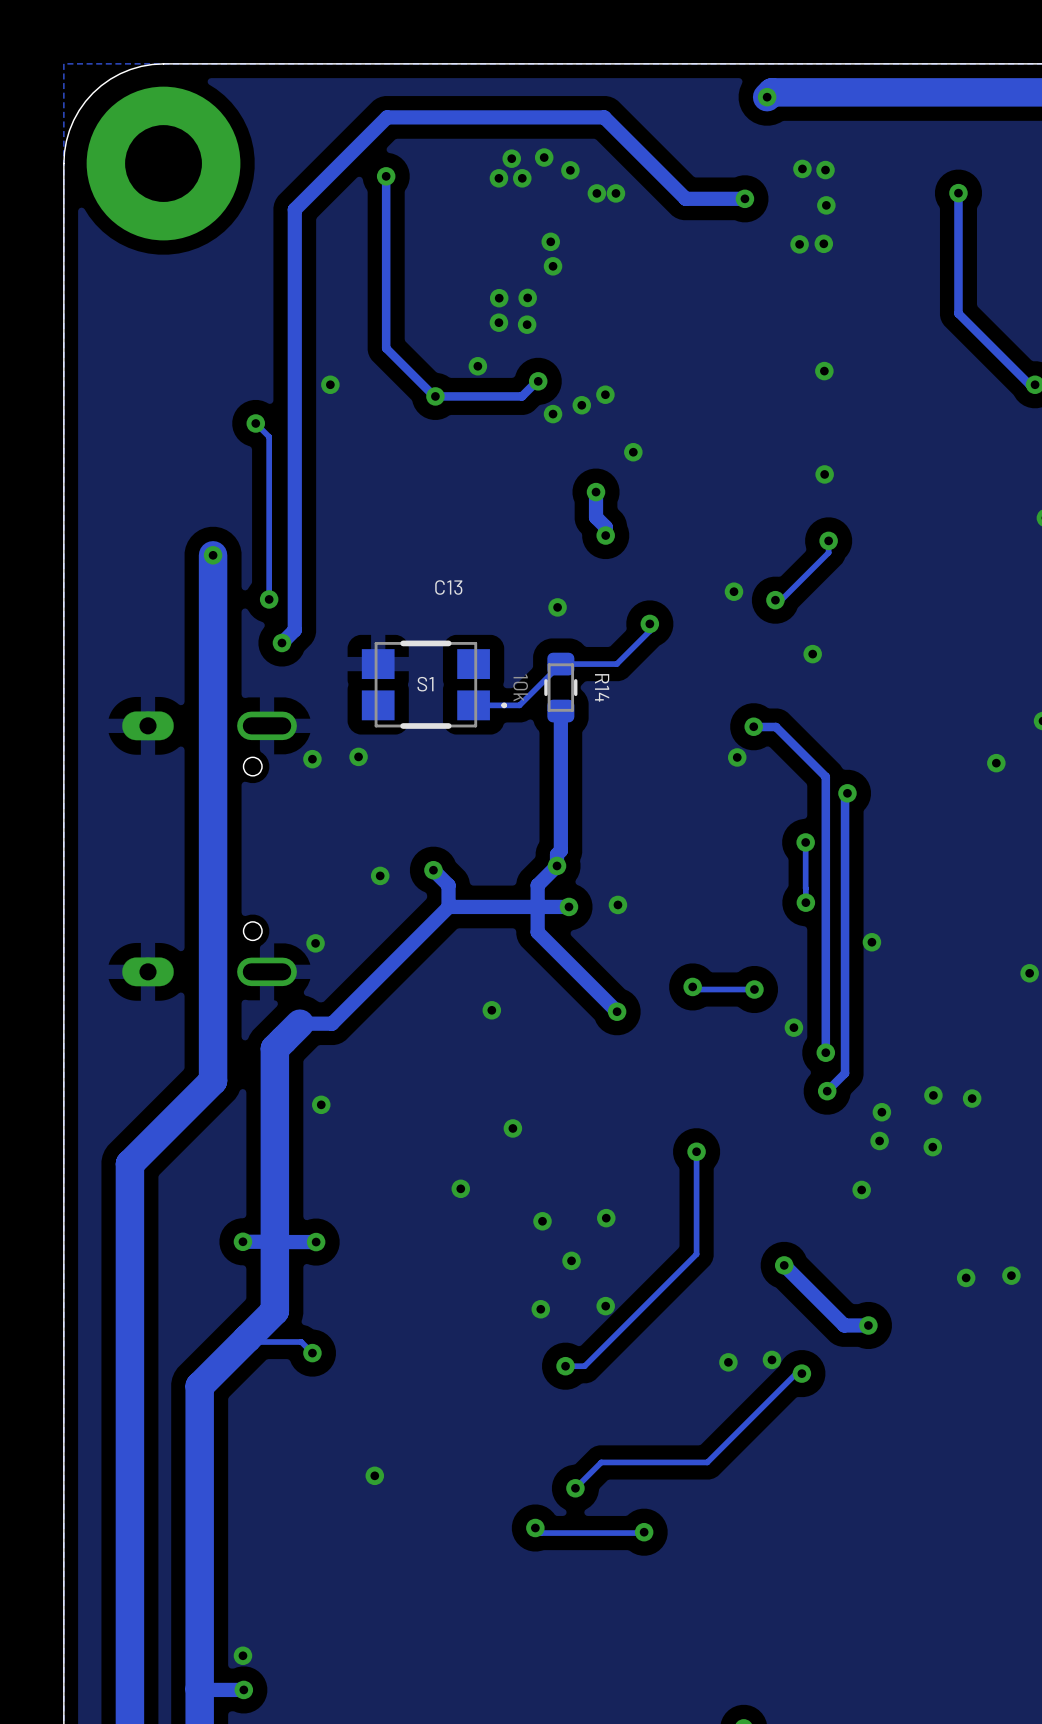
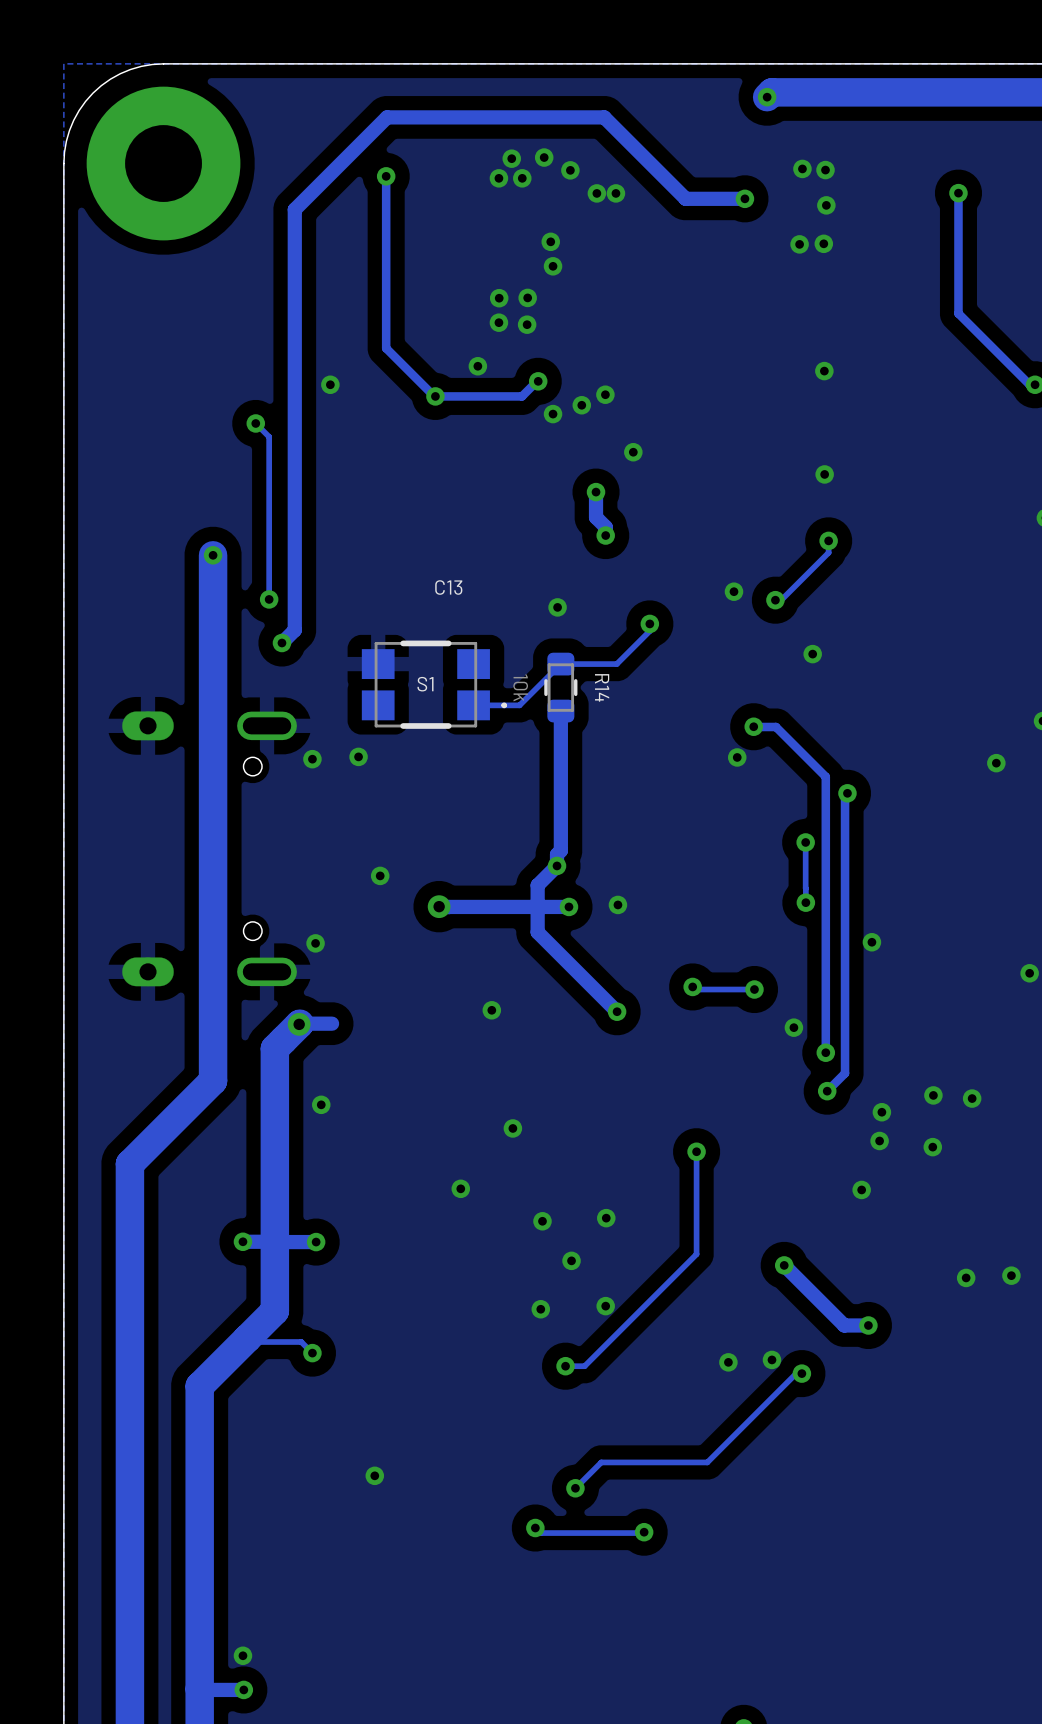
track: (433, 870) (448, 885) (448, 906) -> none
via: (433, 870) -> none
via: none -> (439, 906)
track: (448, 907) (332, 1023) -> none
via: none -> (299, 1024)

